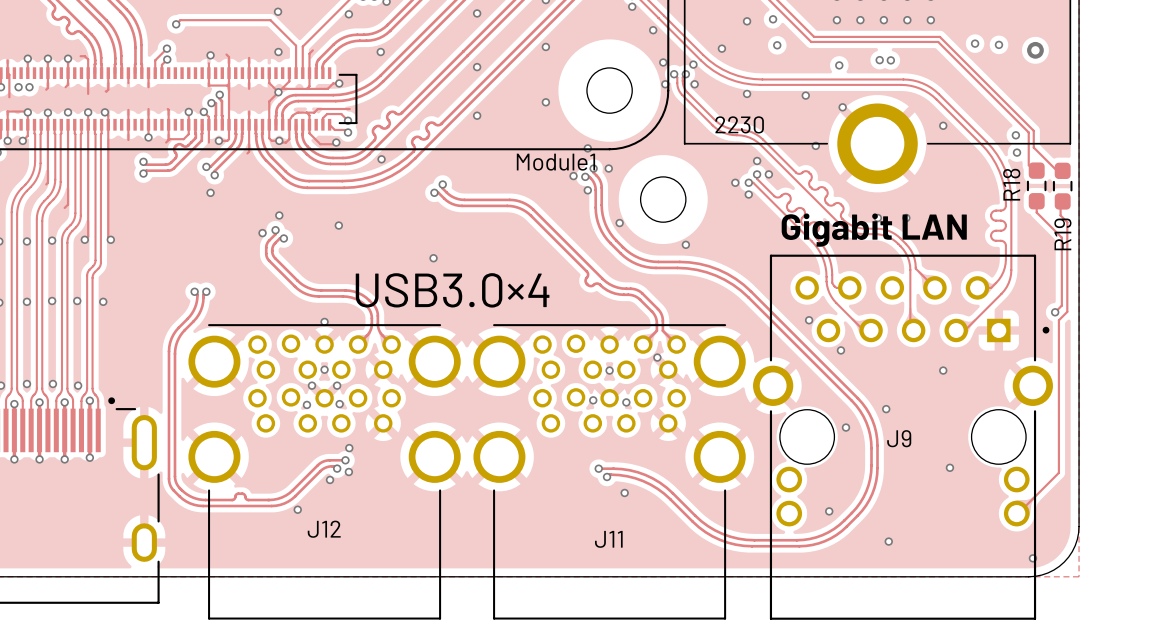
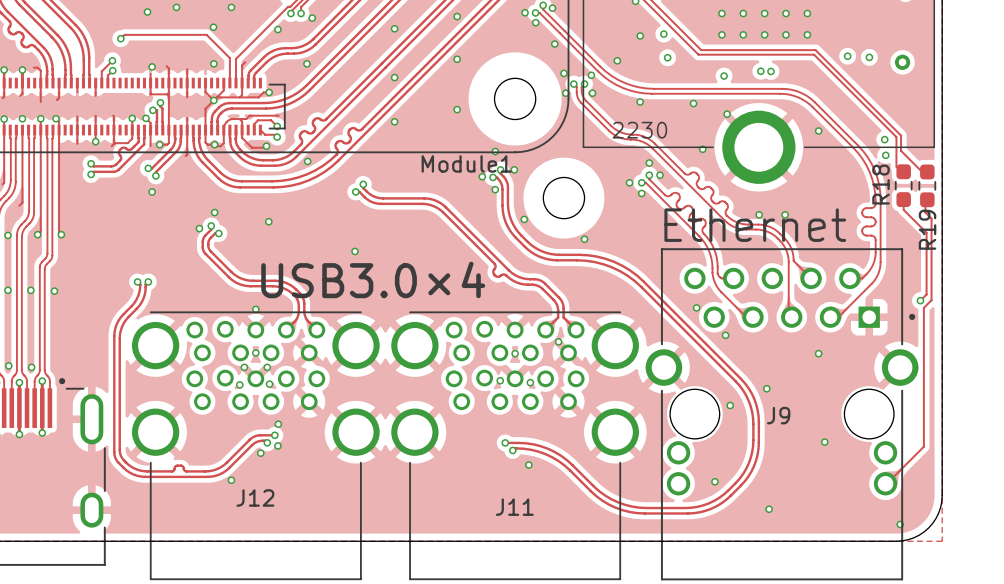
text: Gigabit LAN (874, 230) -> Ethernet (755, 225)

